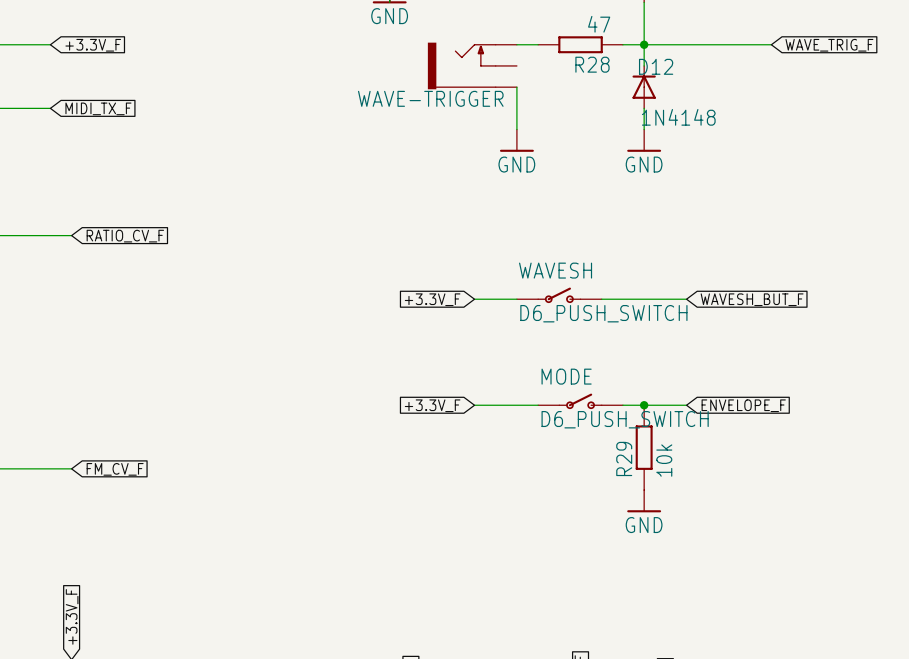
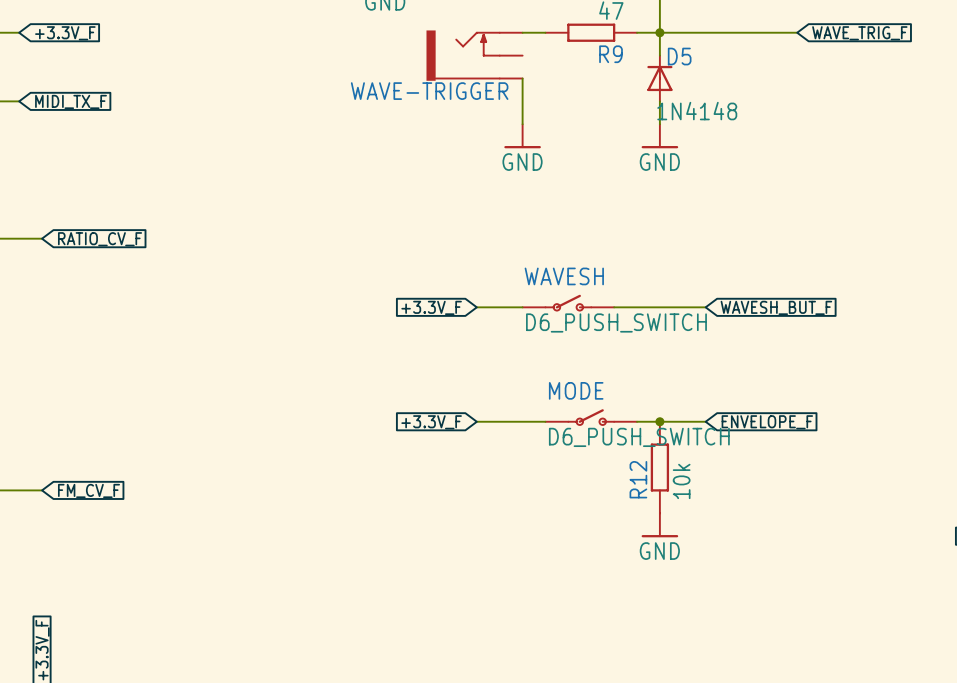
R28 name: R28 (592, 64) -> R9 (611, 54)
D12 name: D12 (656, 66) -> D5 (679, 56)
R29 name: R29 (624, 458) -> R12 (638, 479)

